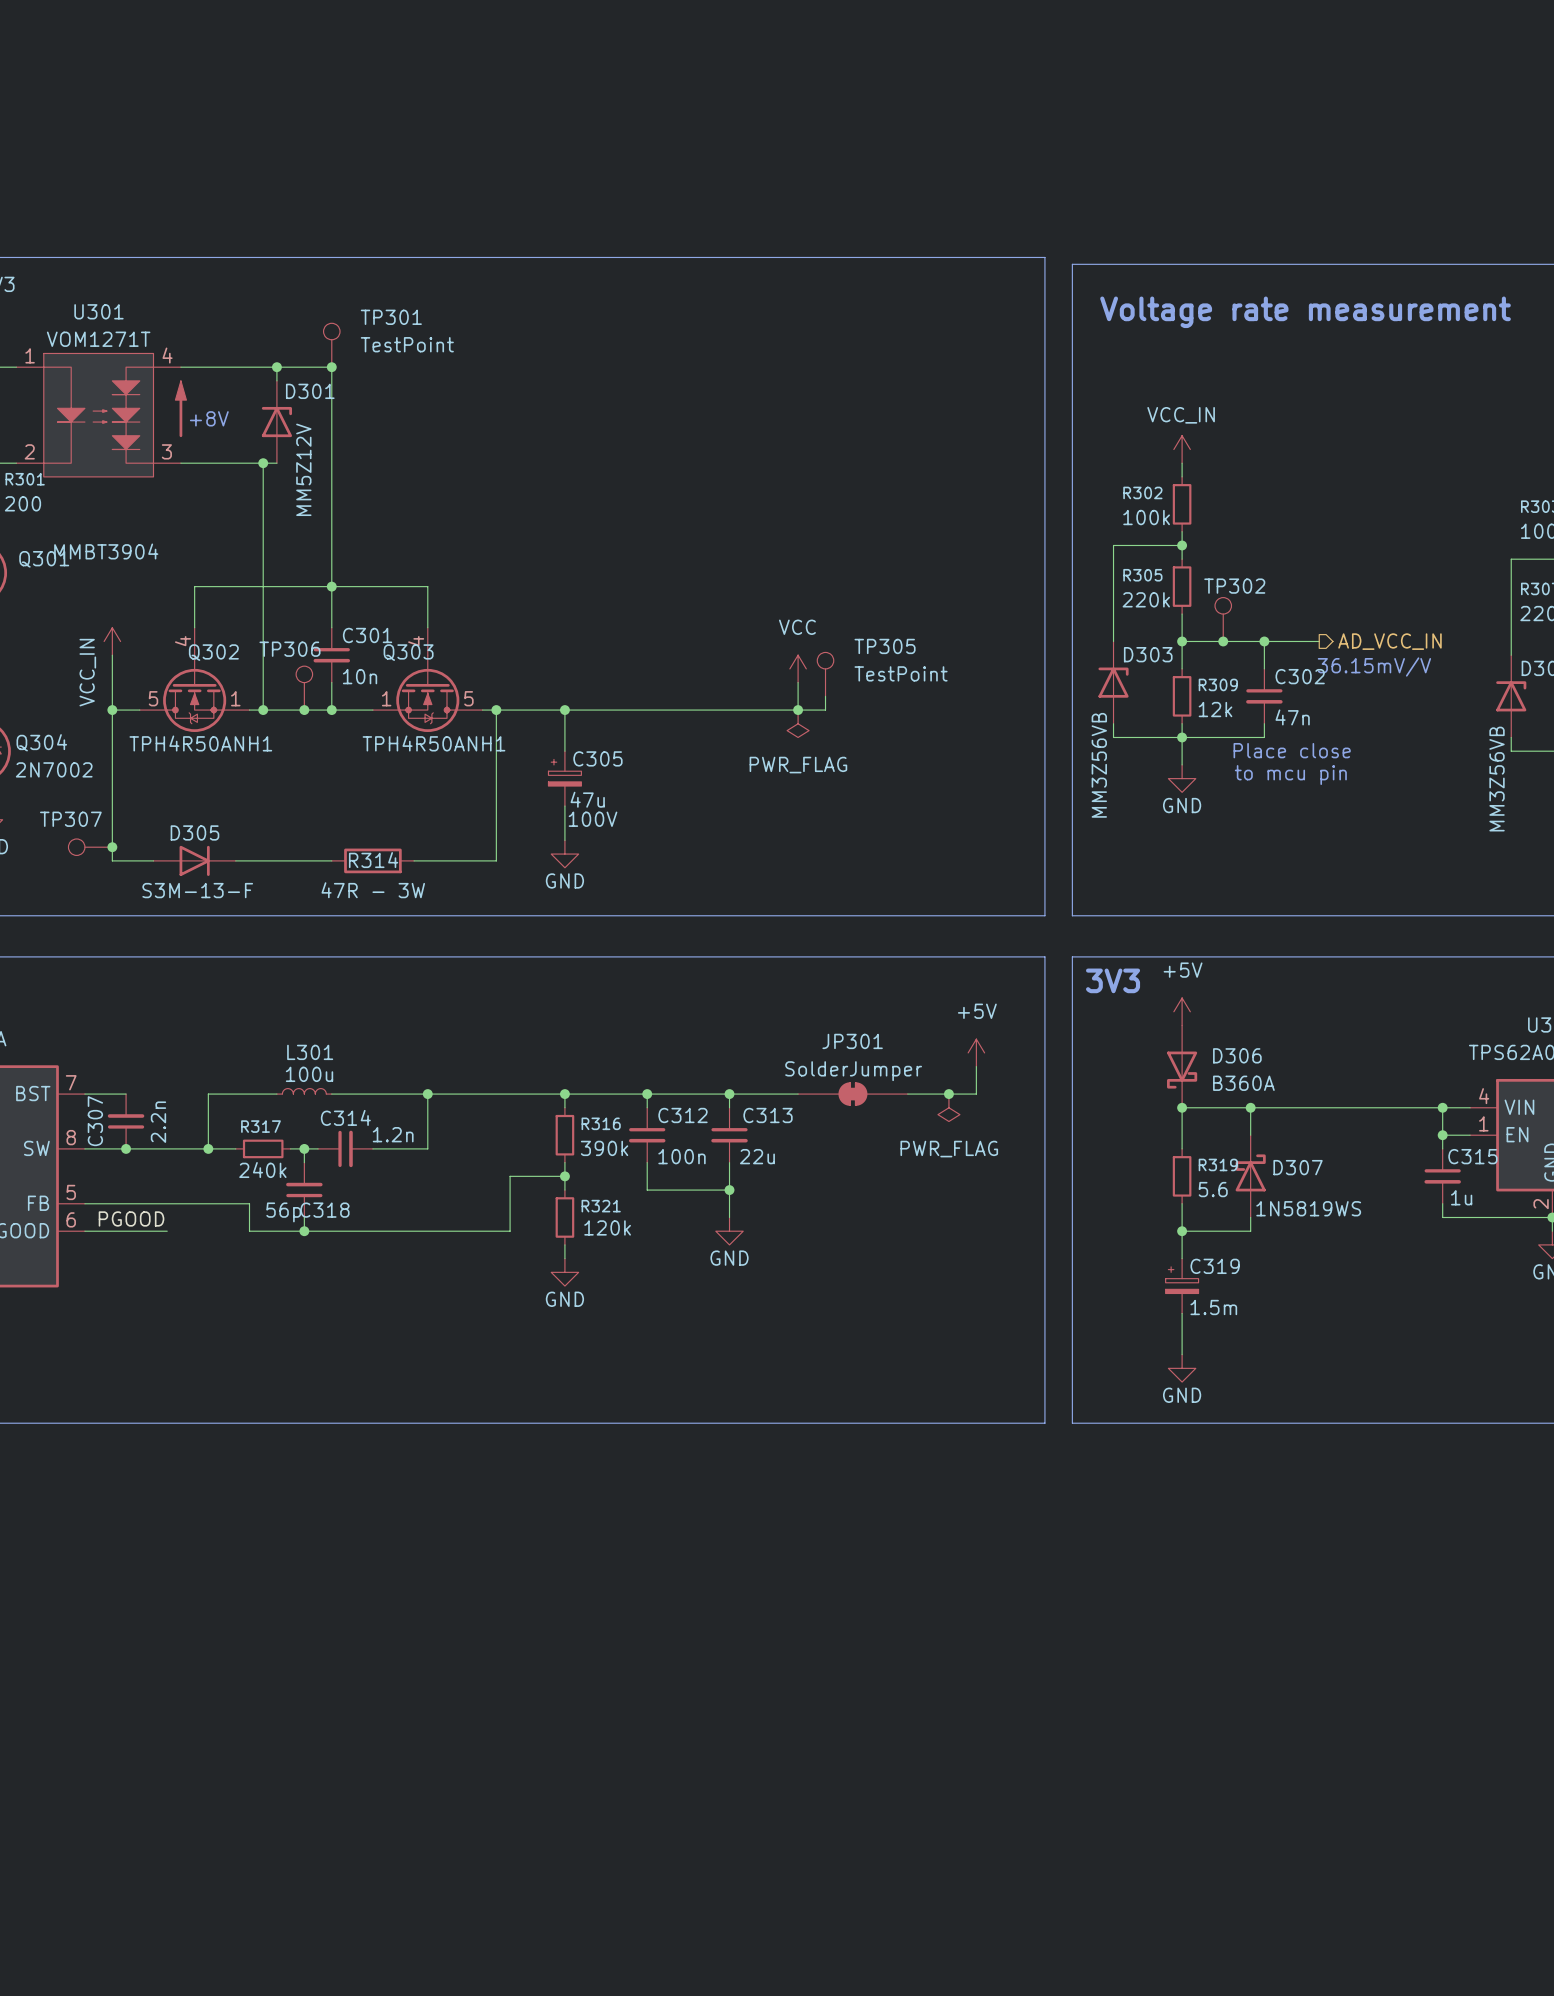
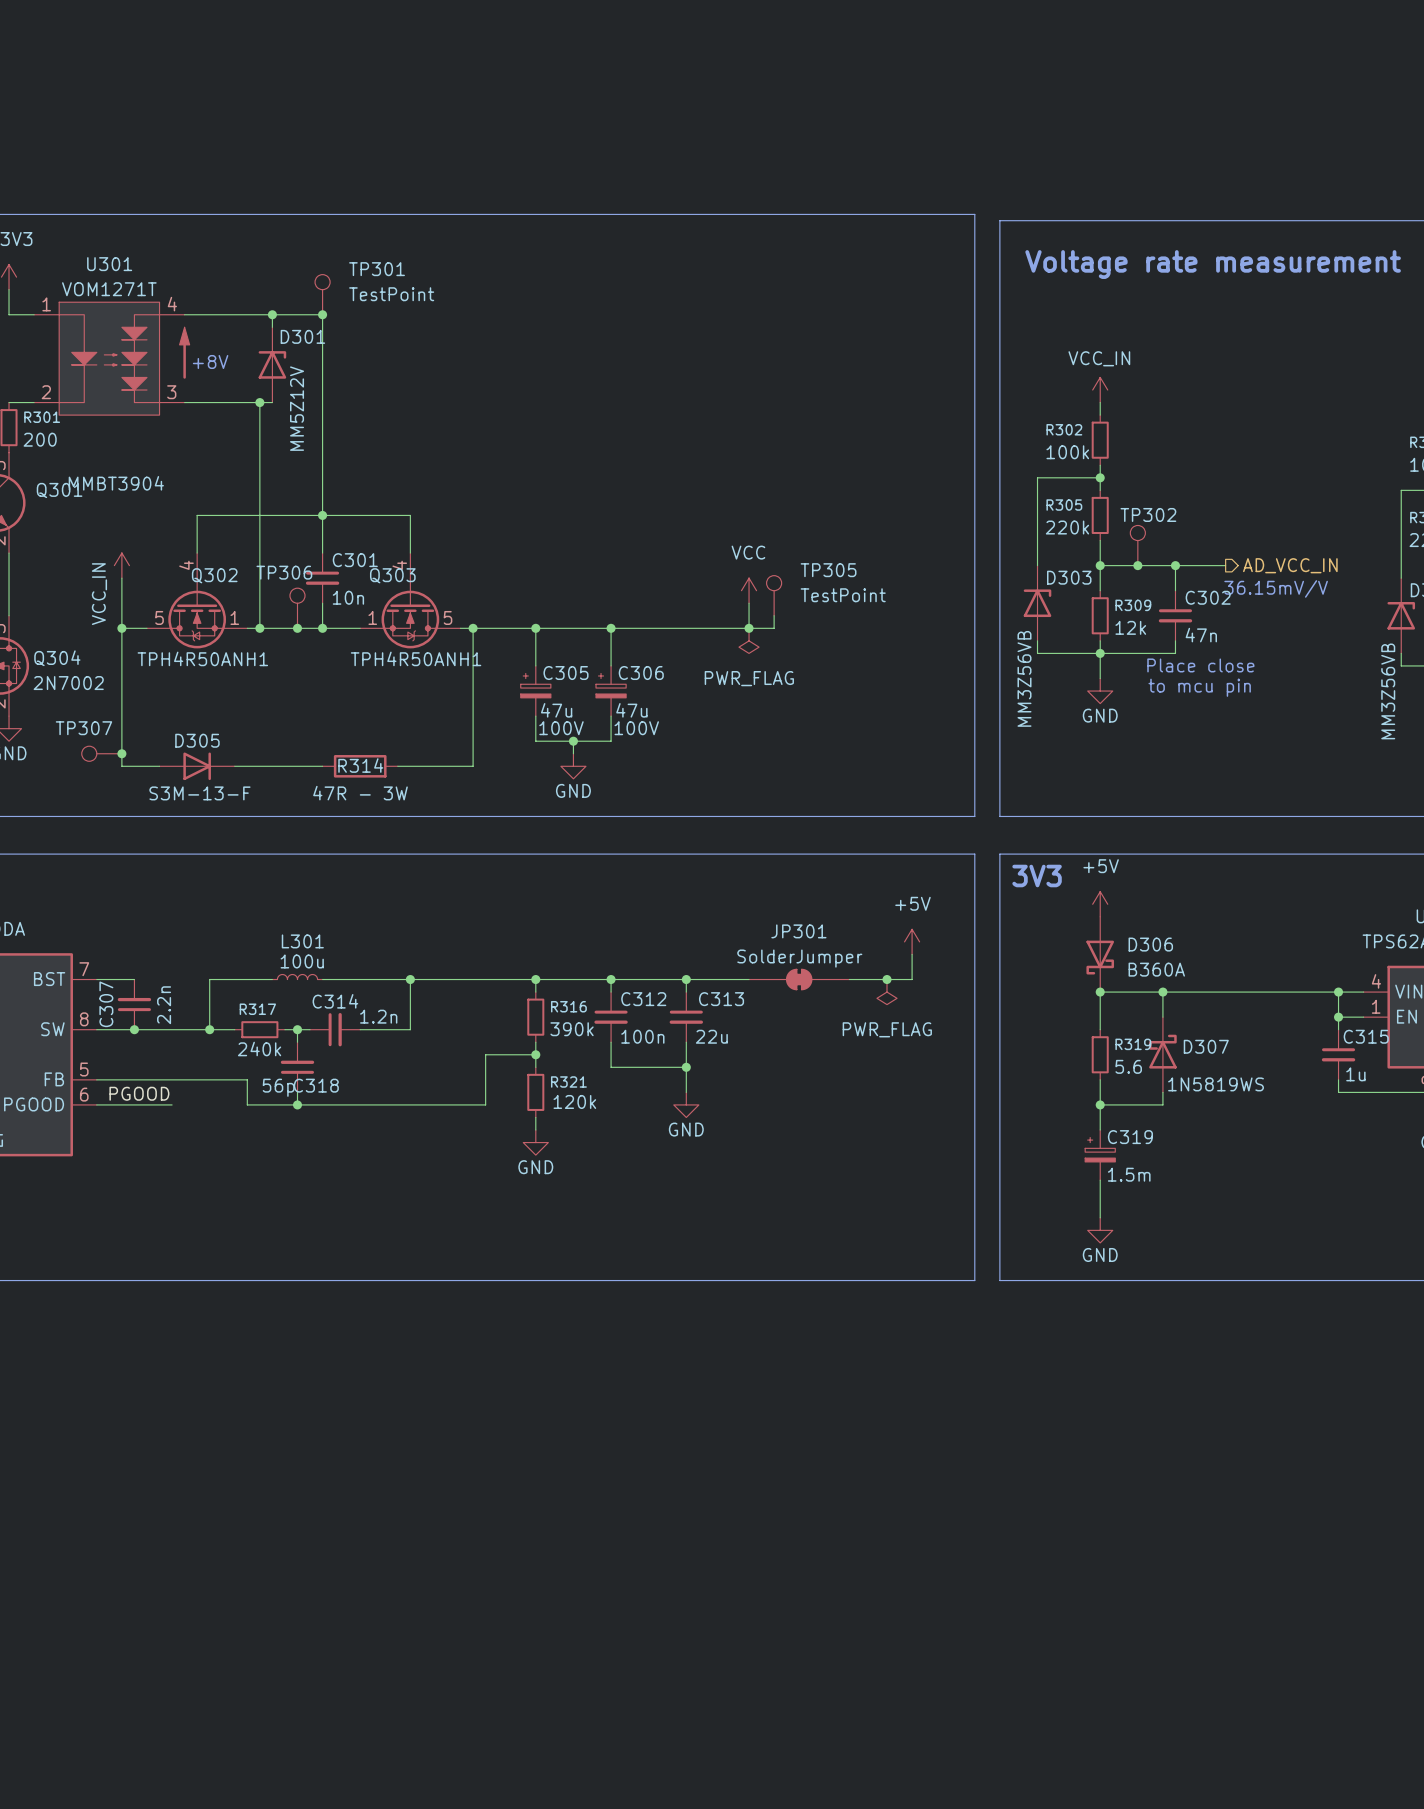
wire: none -> (611, 628) (611, 665)
junction: none -> (611, 628)
C306: none -> 47u (611, 691)
wire: (564, 833) (564, 840) -> (535, 741) (611, 741) (611, 716)
wire: none -> (573, 741) (573, 753)
junction: none -> (573, 741)
power symbol position: GND (564, 854) -> GND (573, 766)

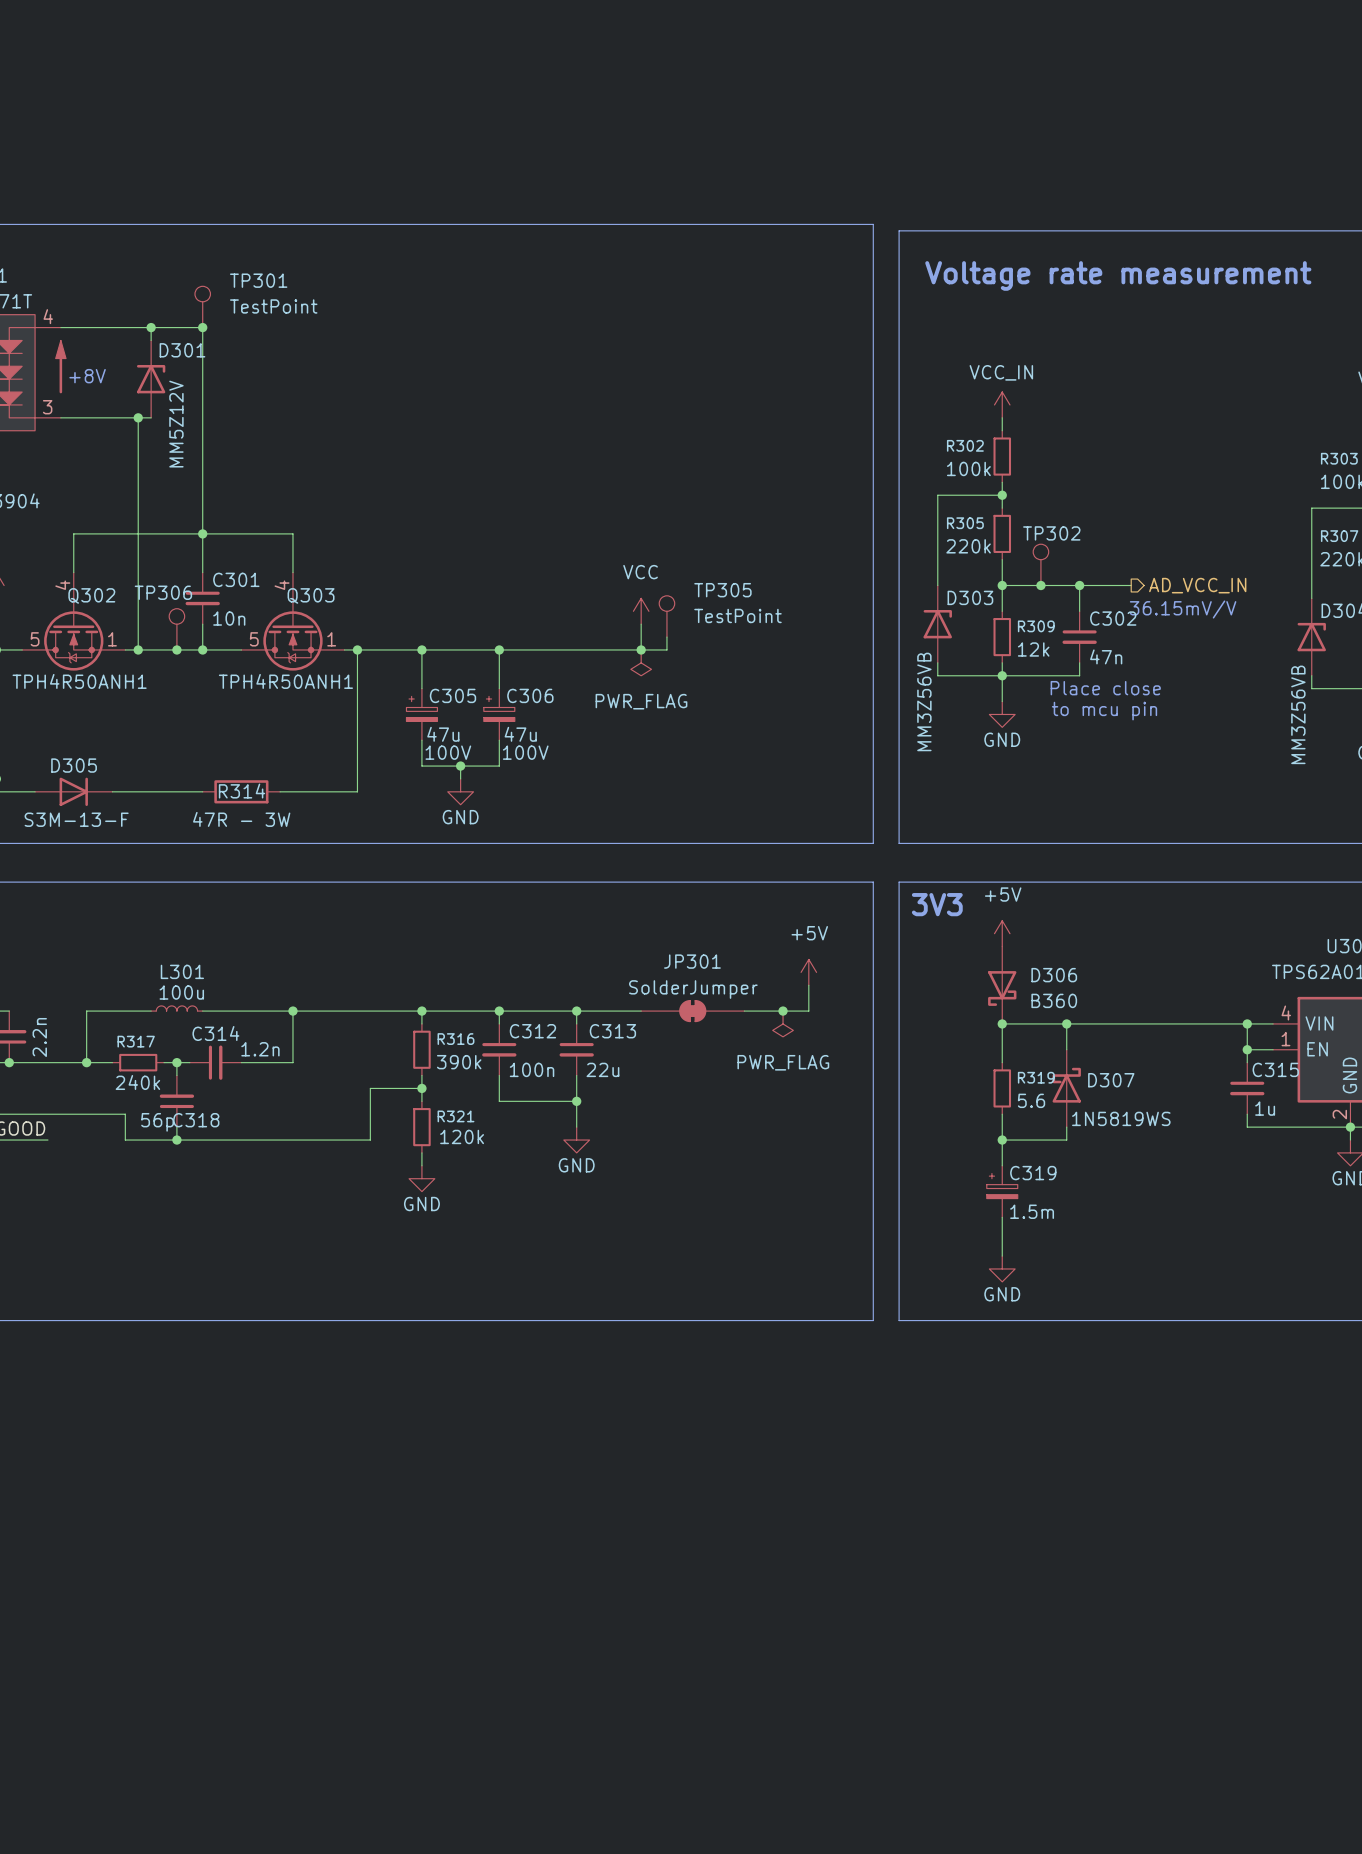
Q303 flip: as is (410, 613) -> left-right (292, 634)
D306 value: B360A (1156, 969) -> B360 (1054, 1000)

